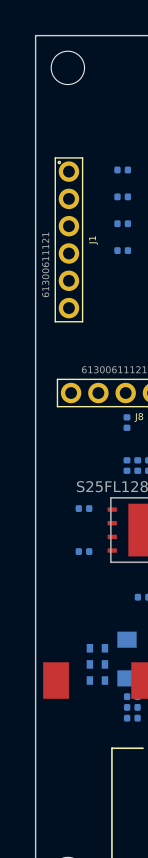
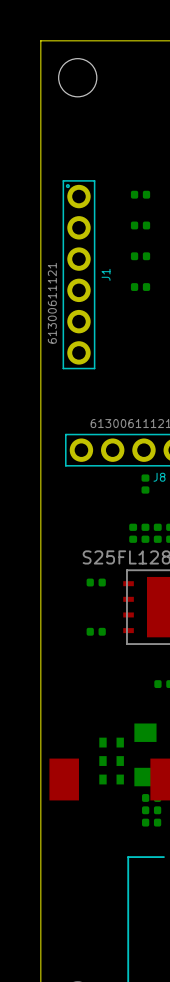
part: none -> (133, 533)

